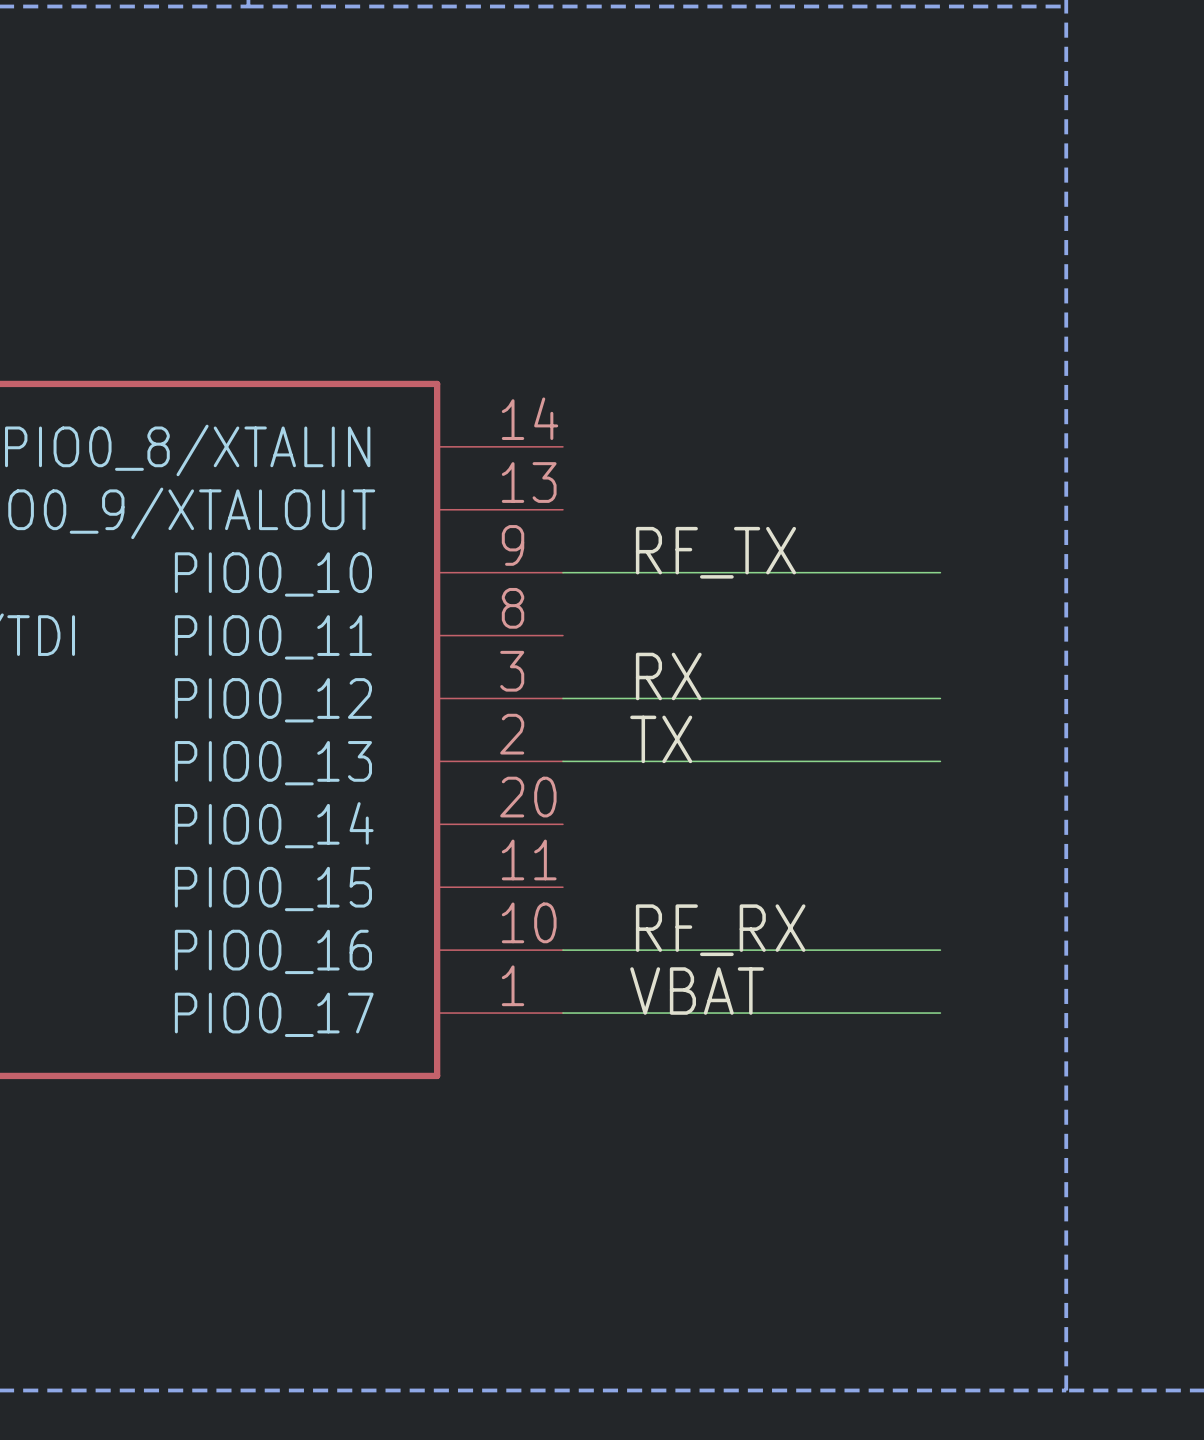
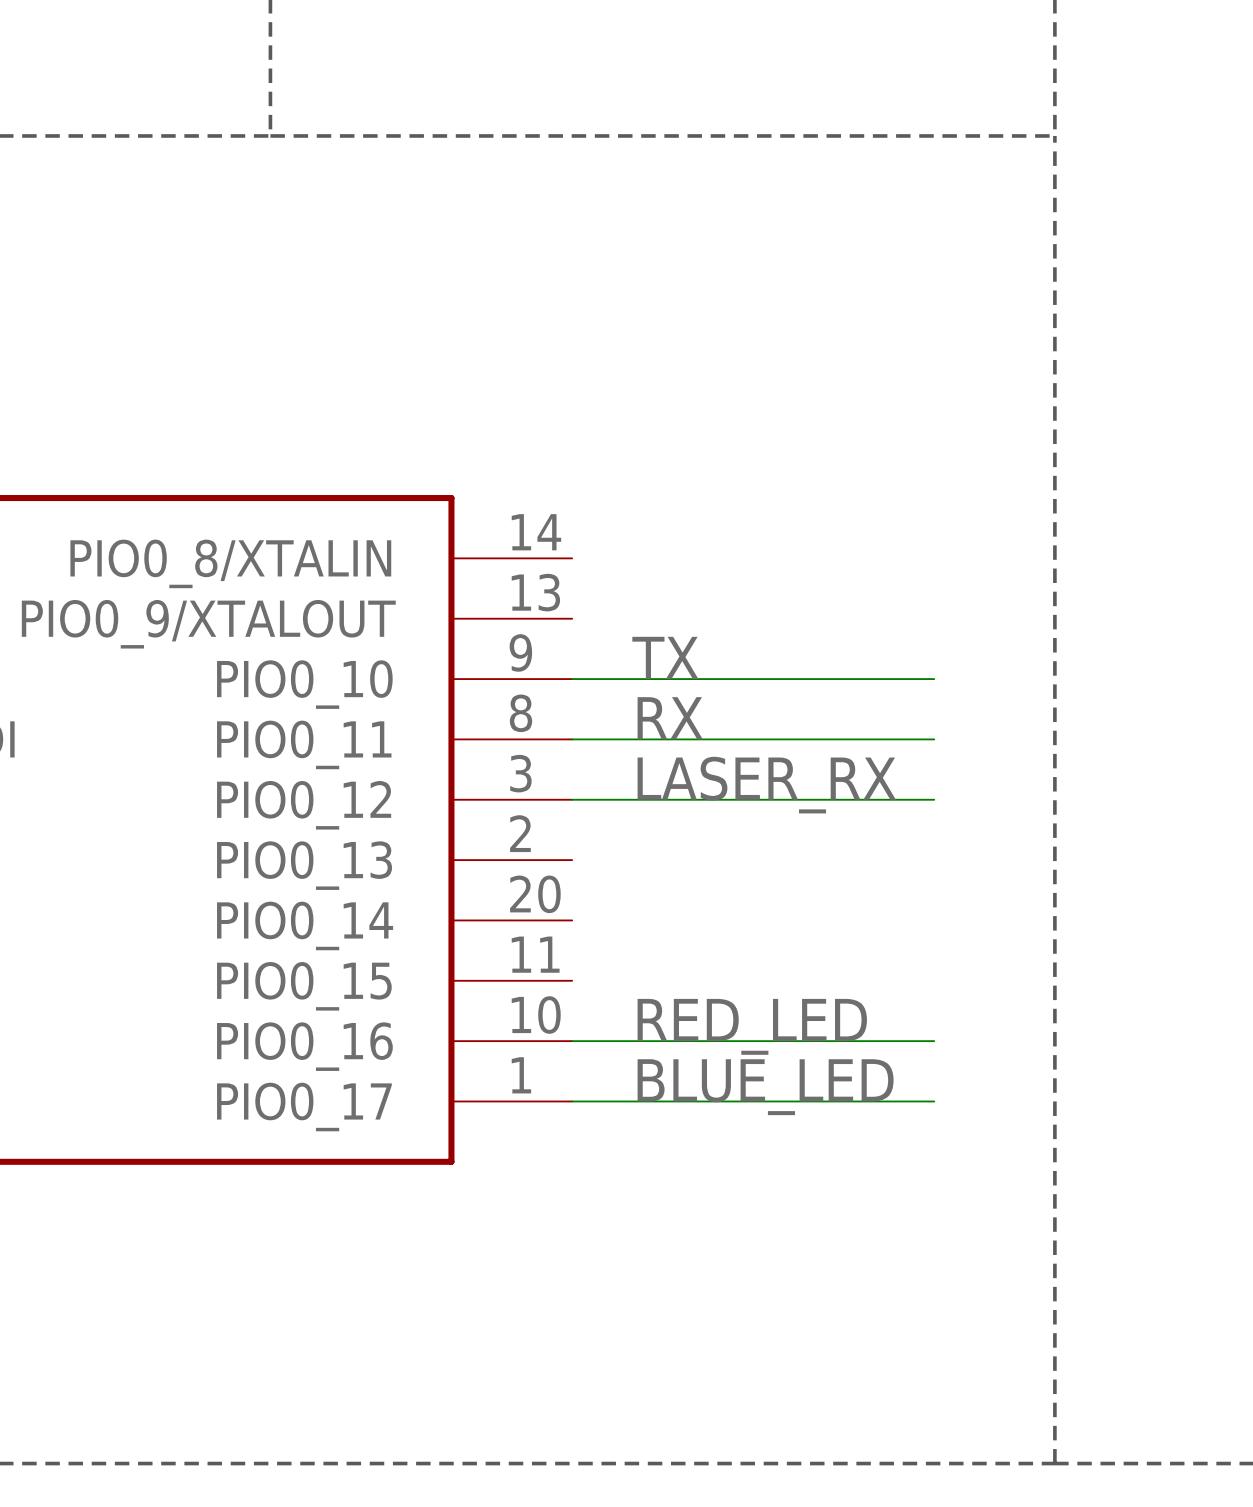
label: RF_TX (715, 552) -> TX (665, 657)
label: none -> RX (670, 718)
label: RX (668, 676) -> LASER_RX (766, 785)
label: TX (661, 739) -> none
wire: (562, 761) (940, 761) -> (572, 739) (934, 739)
label: RF_RX (720, 930) -> RED_LED (752, 1026)
label: VBAT (697, 991) -> BLUE_LED (765, 1087)

